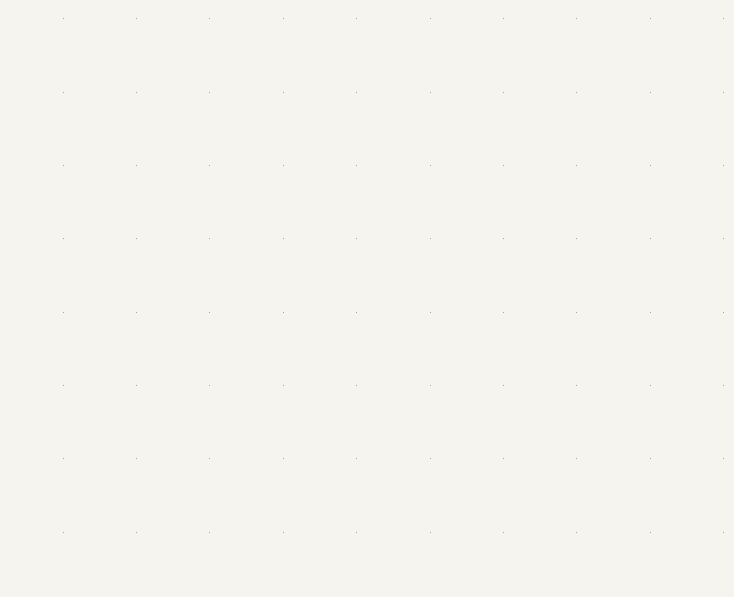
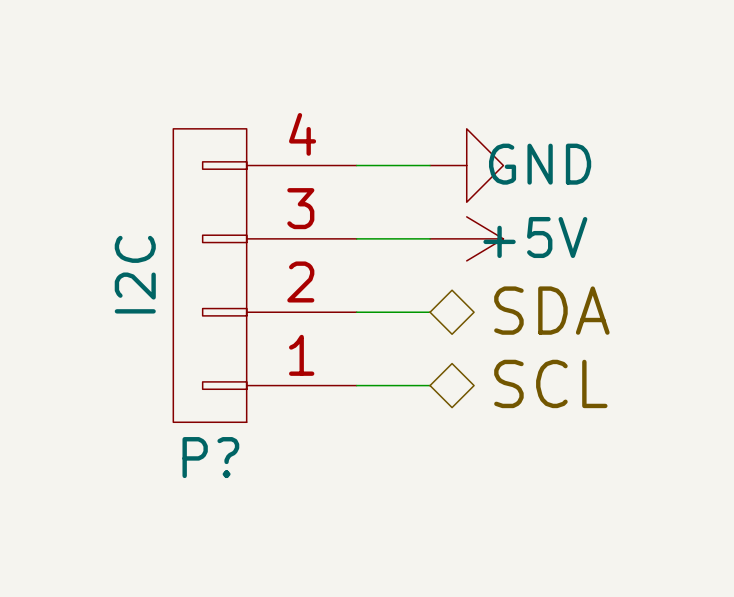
wire: none -> (356, 165) (430, 165)
power symbol: none -> GND (466, 165)
wire: none -> (356, 238) (430, 238)
power symbol: none -> +5V (466, 238)
P?: none -> I2C (265, 275)
hierarchical label: none -> SDA (551, 310)
wire: none -> (356, 312) (430, 312)
hierarchical label: none -> SCL (550, 383)
wire: none -> (356, 385) (430, 385)

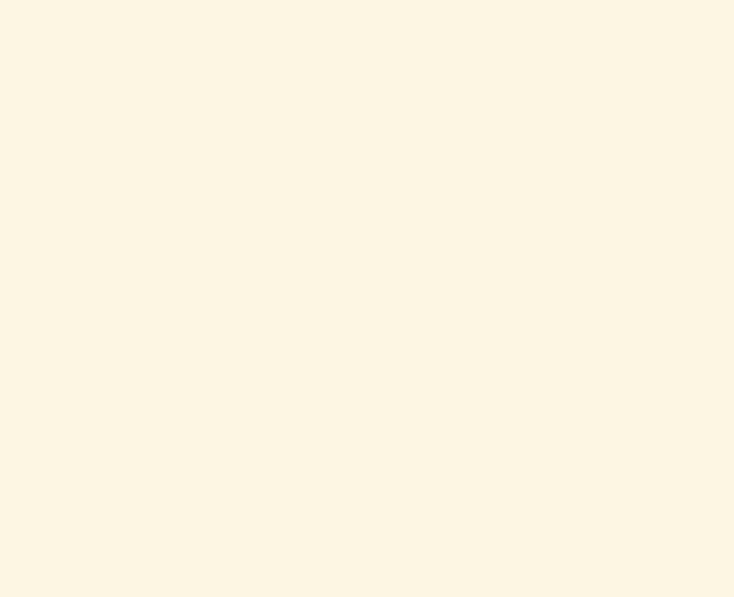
wire: (356, 165) (430, 165) -> none
power symbol: GND (466, 165) -> none
wire: (356, 238) (430, 238) -> none
power symbol: +5V (466, 238) -> none
P?: I2C (265, 275) -> none
hierarchical label: SDA (551, 310) -> none
wire: (356, 312) (430, 312) -> none
hierarchical label: SCL (550, 383) -> none
wire: (356, 385) (430, 385) -> none

